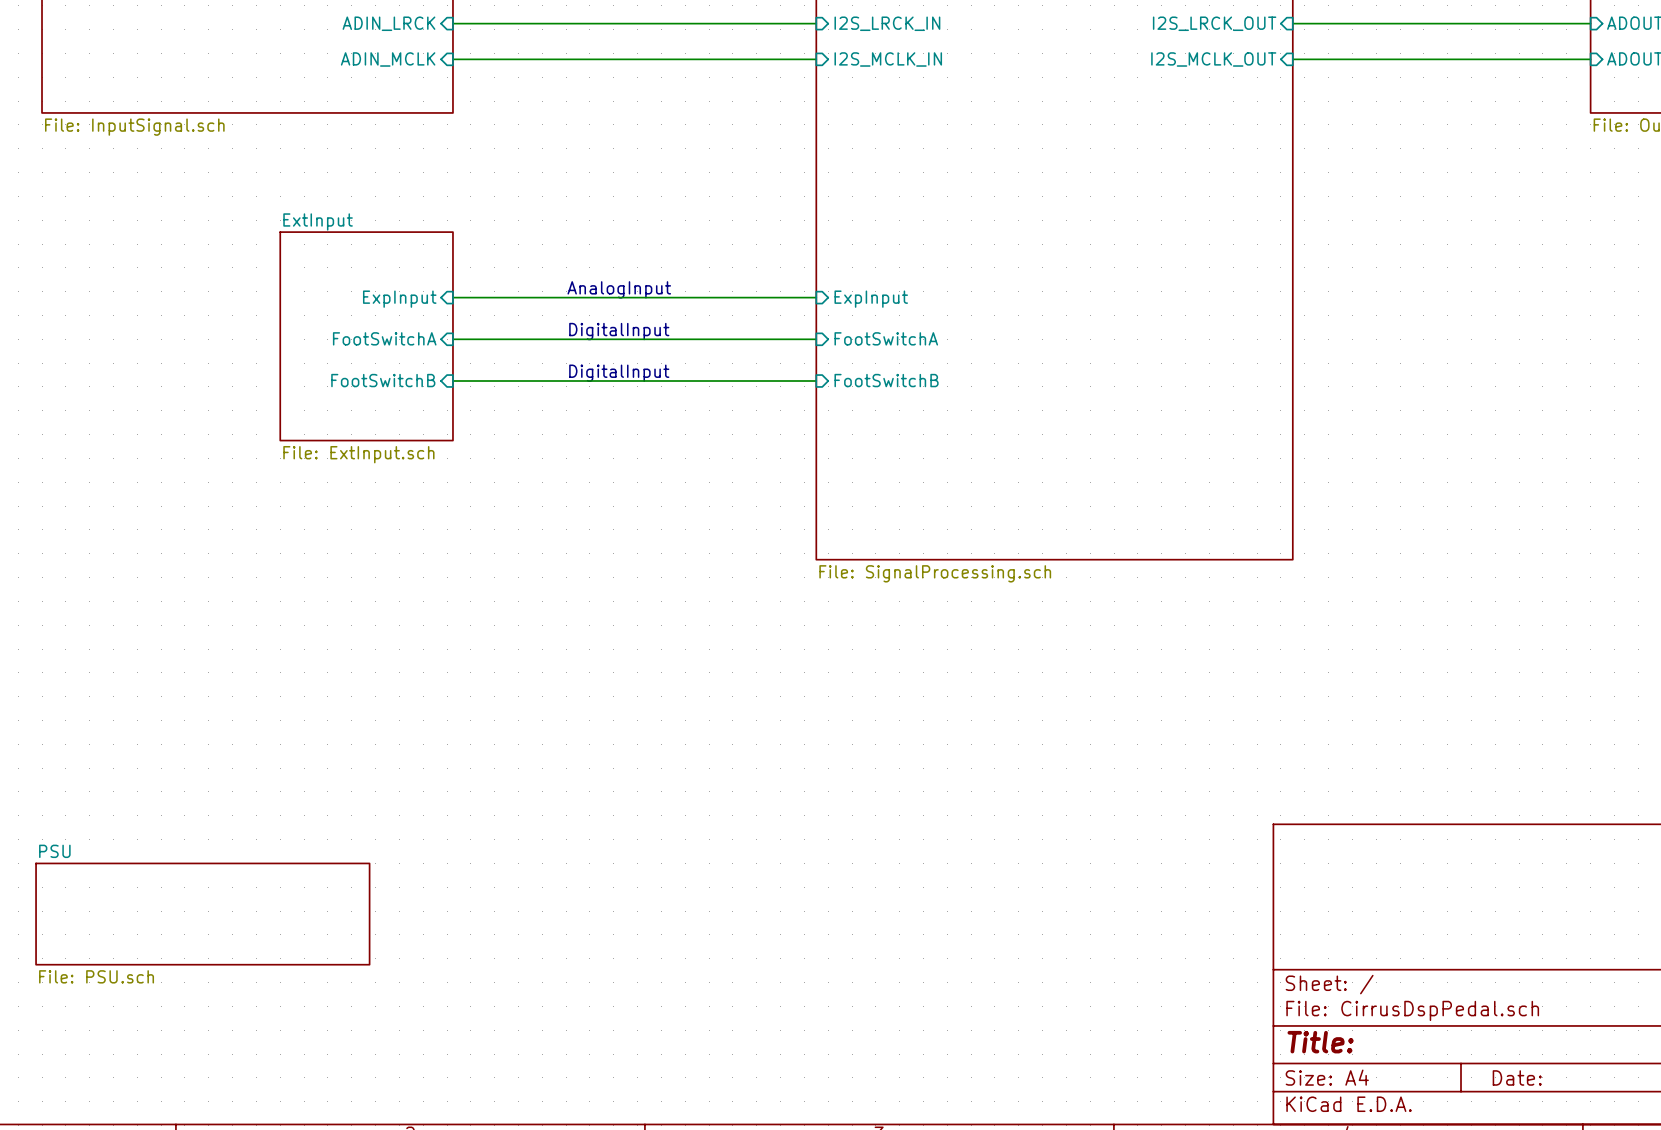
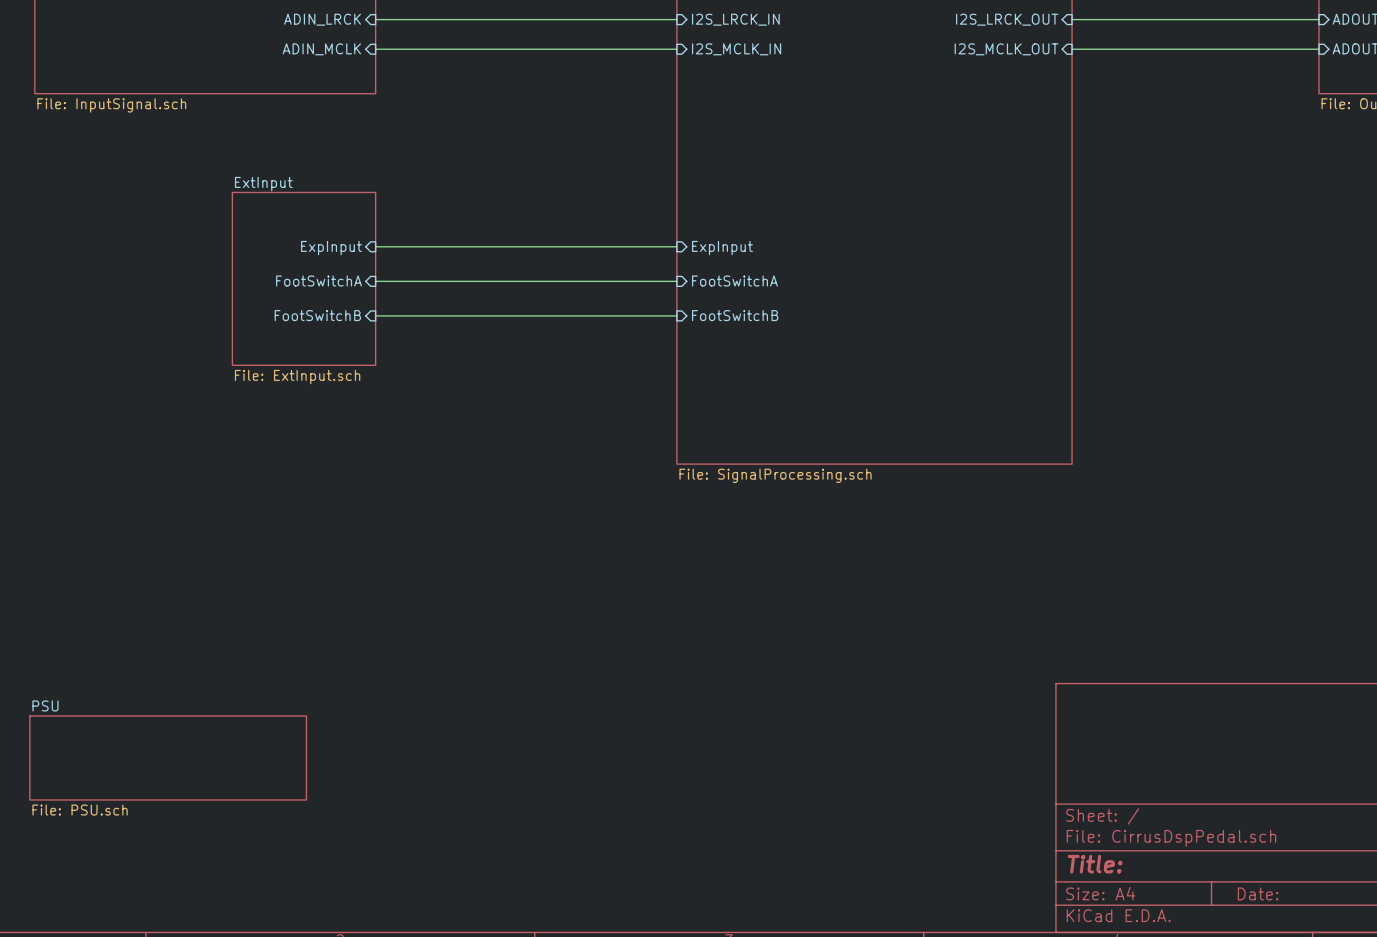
text: AnalogInput (619, 289) -> none
text: DigitalInput (619, 331) -> none
text: DigitalInput (619, 373) -> none

